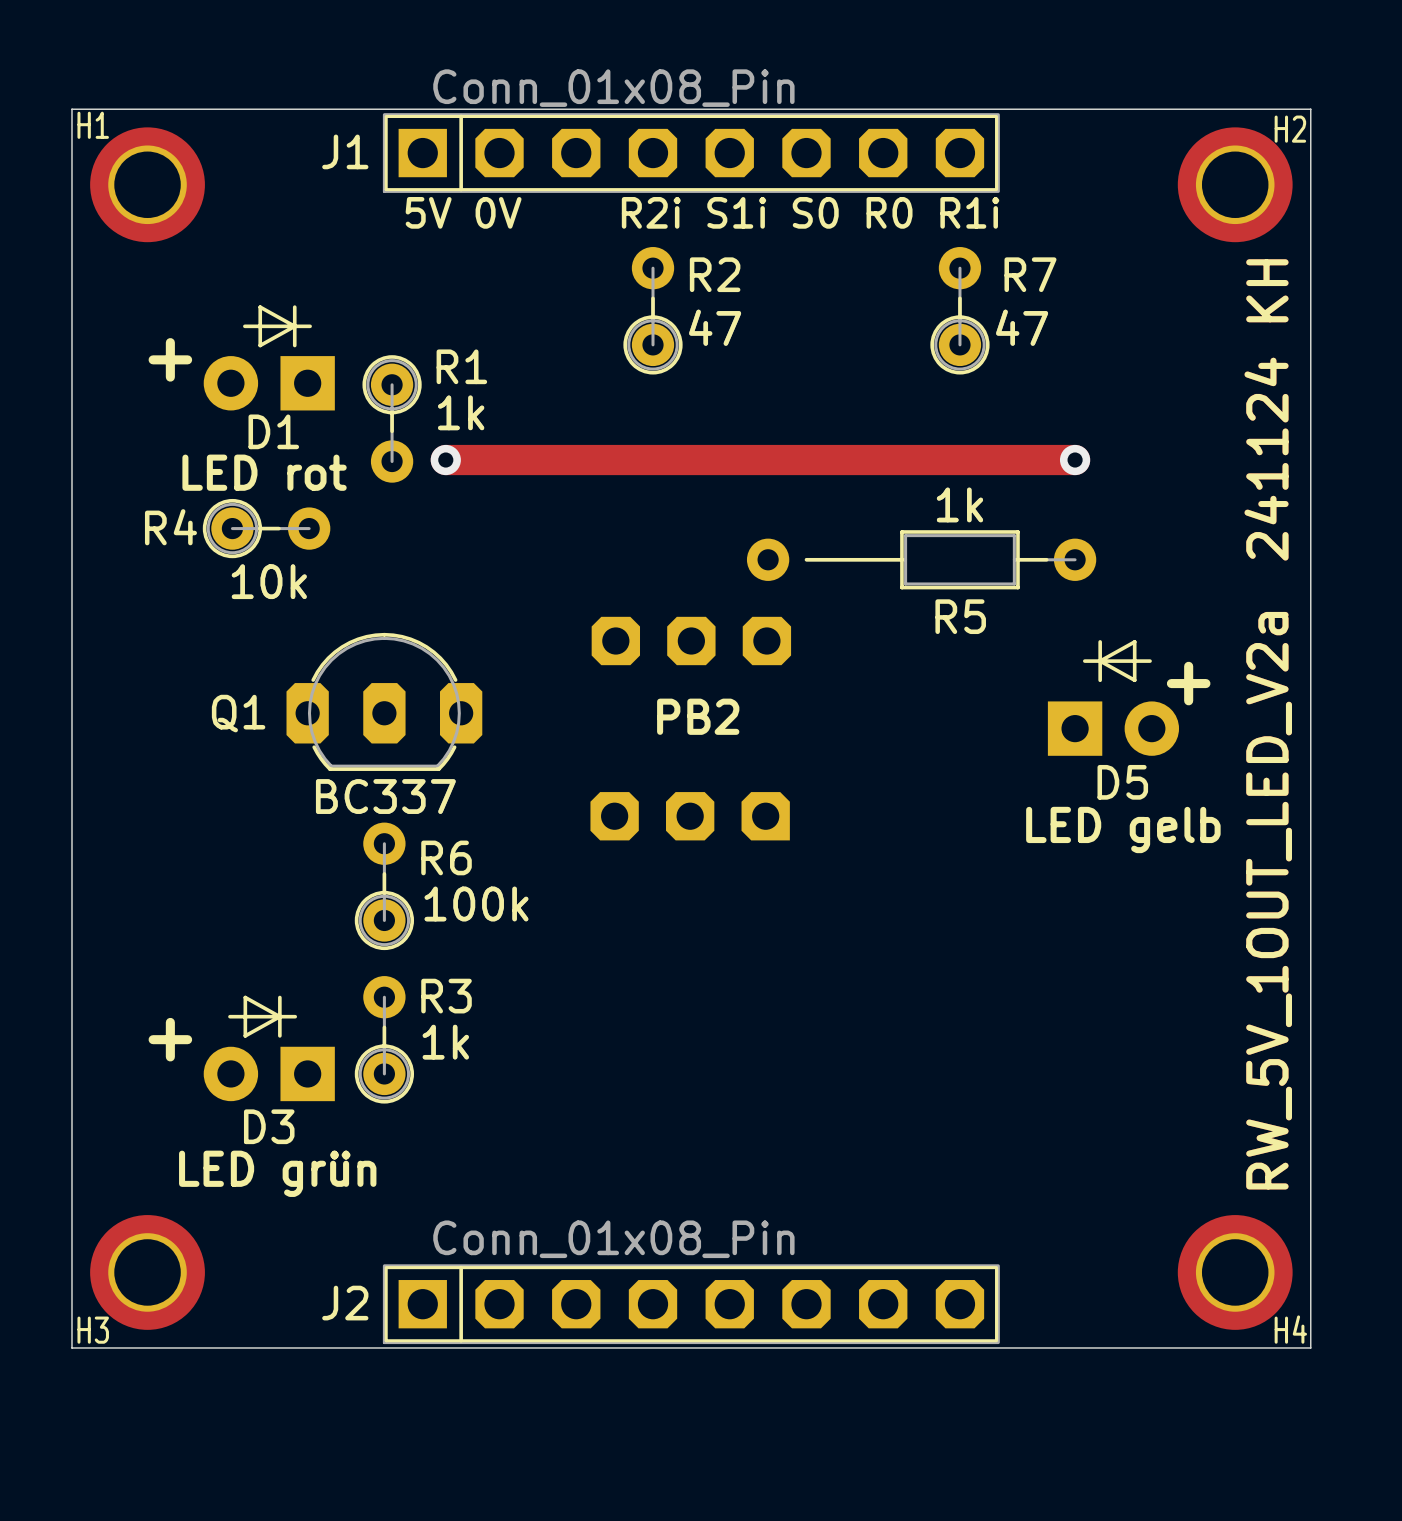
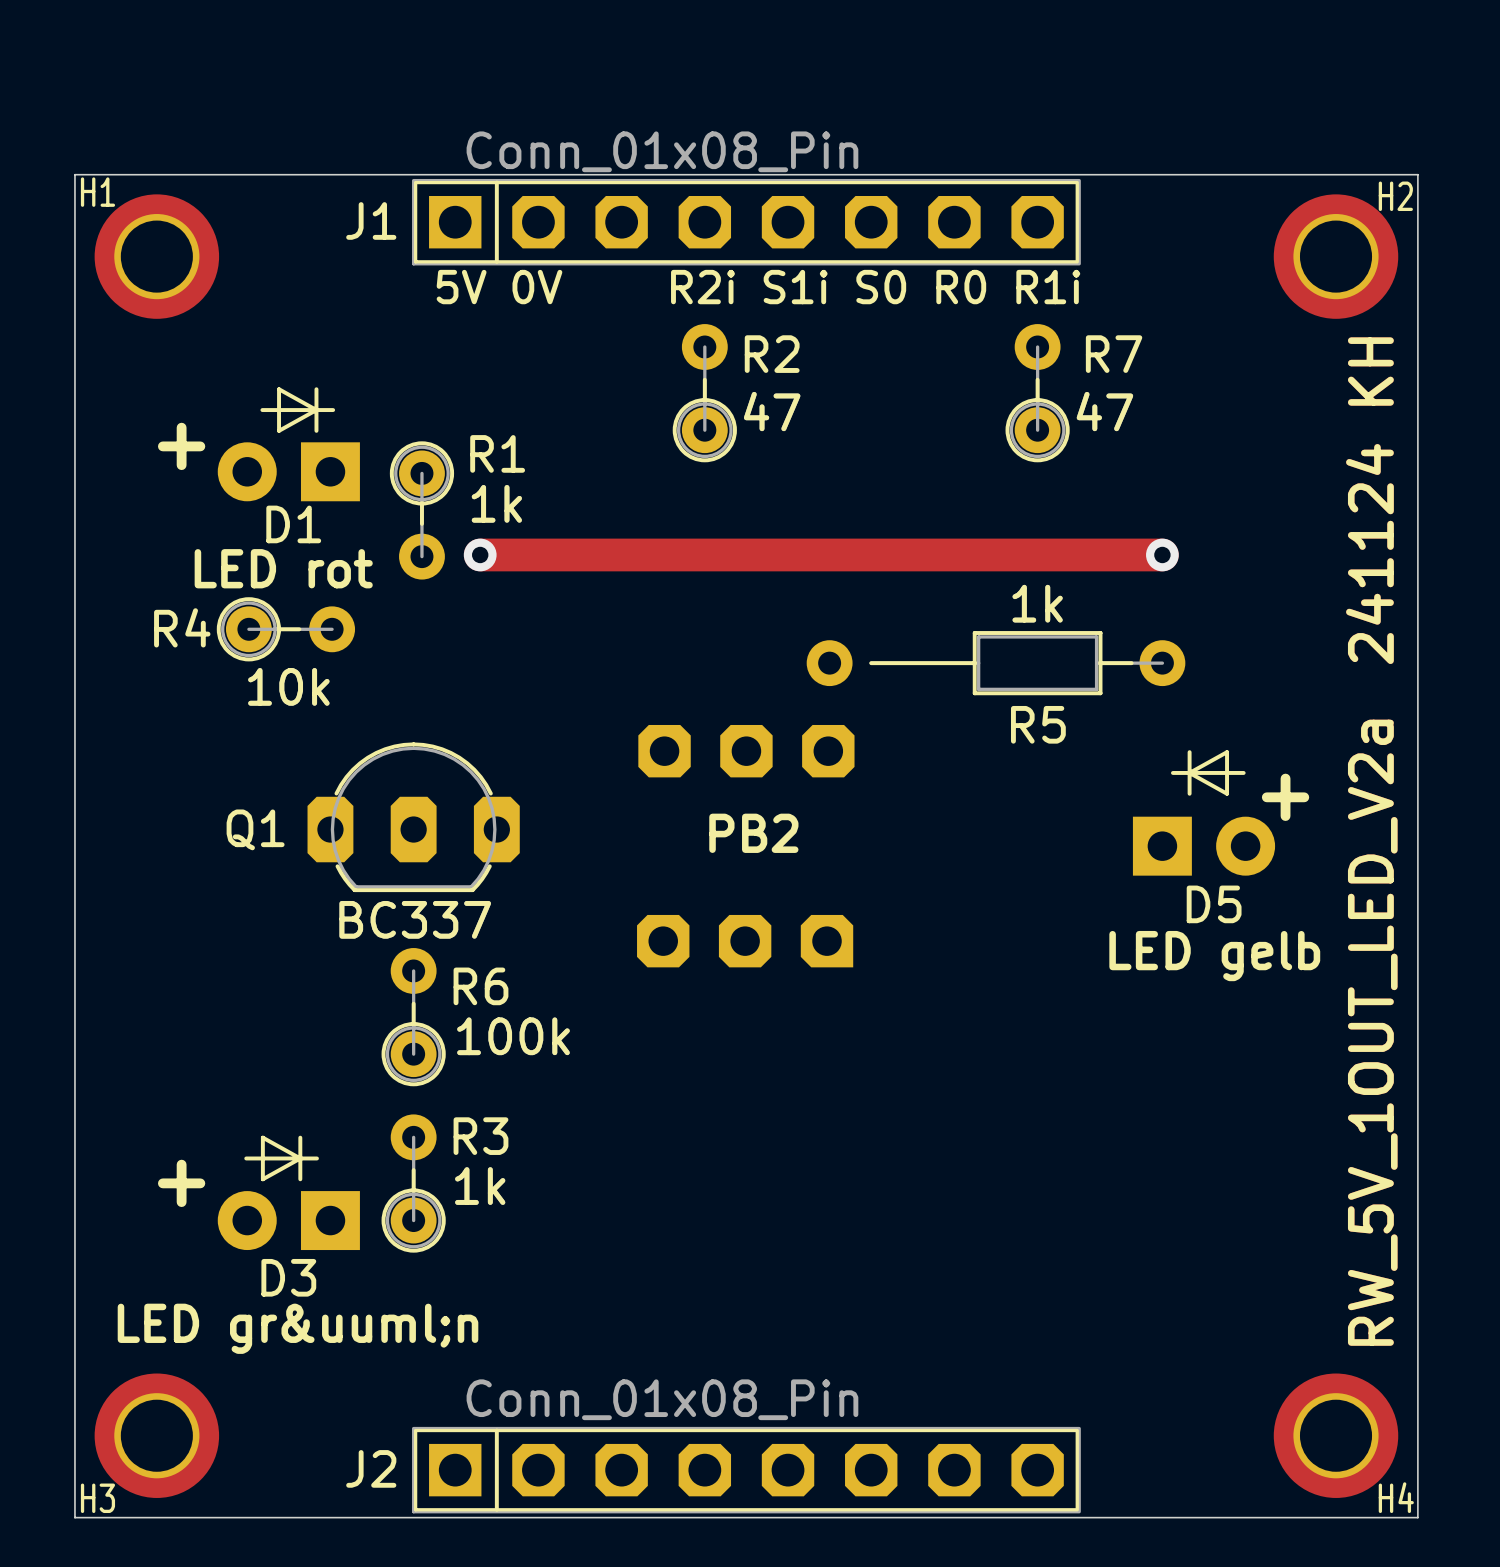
text: LED grün (277, 1173) -> LED gr&uuml;n (298, 1328)

